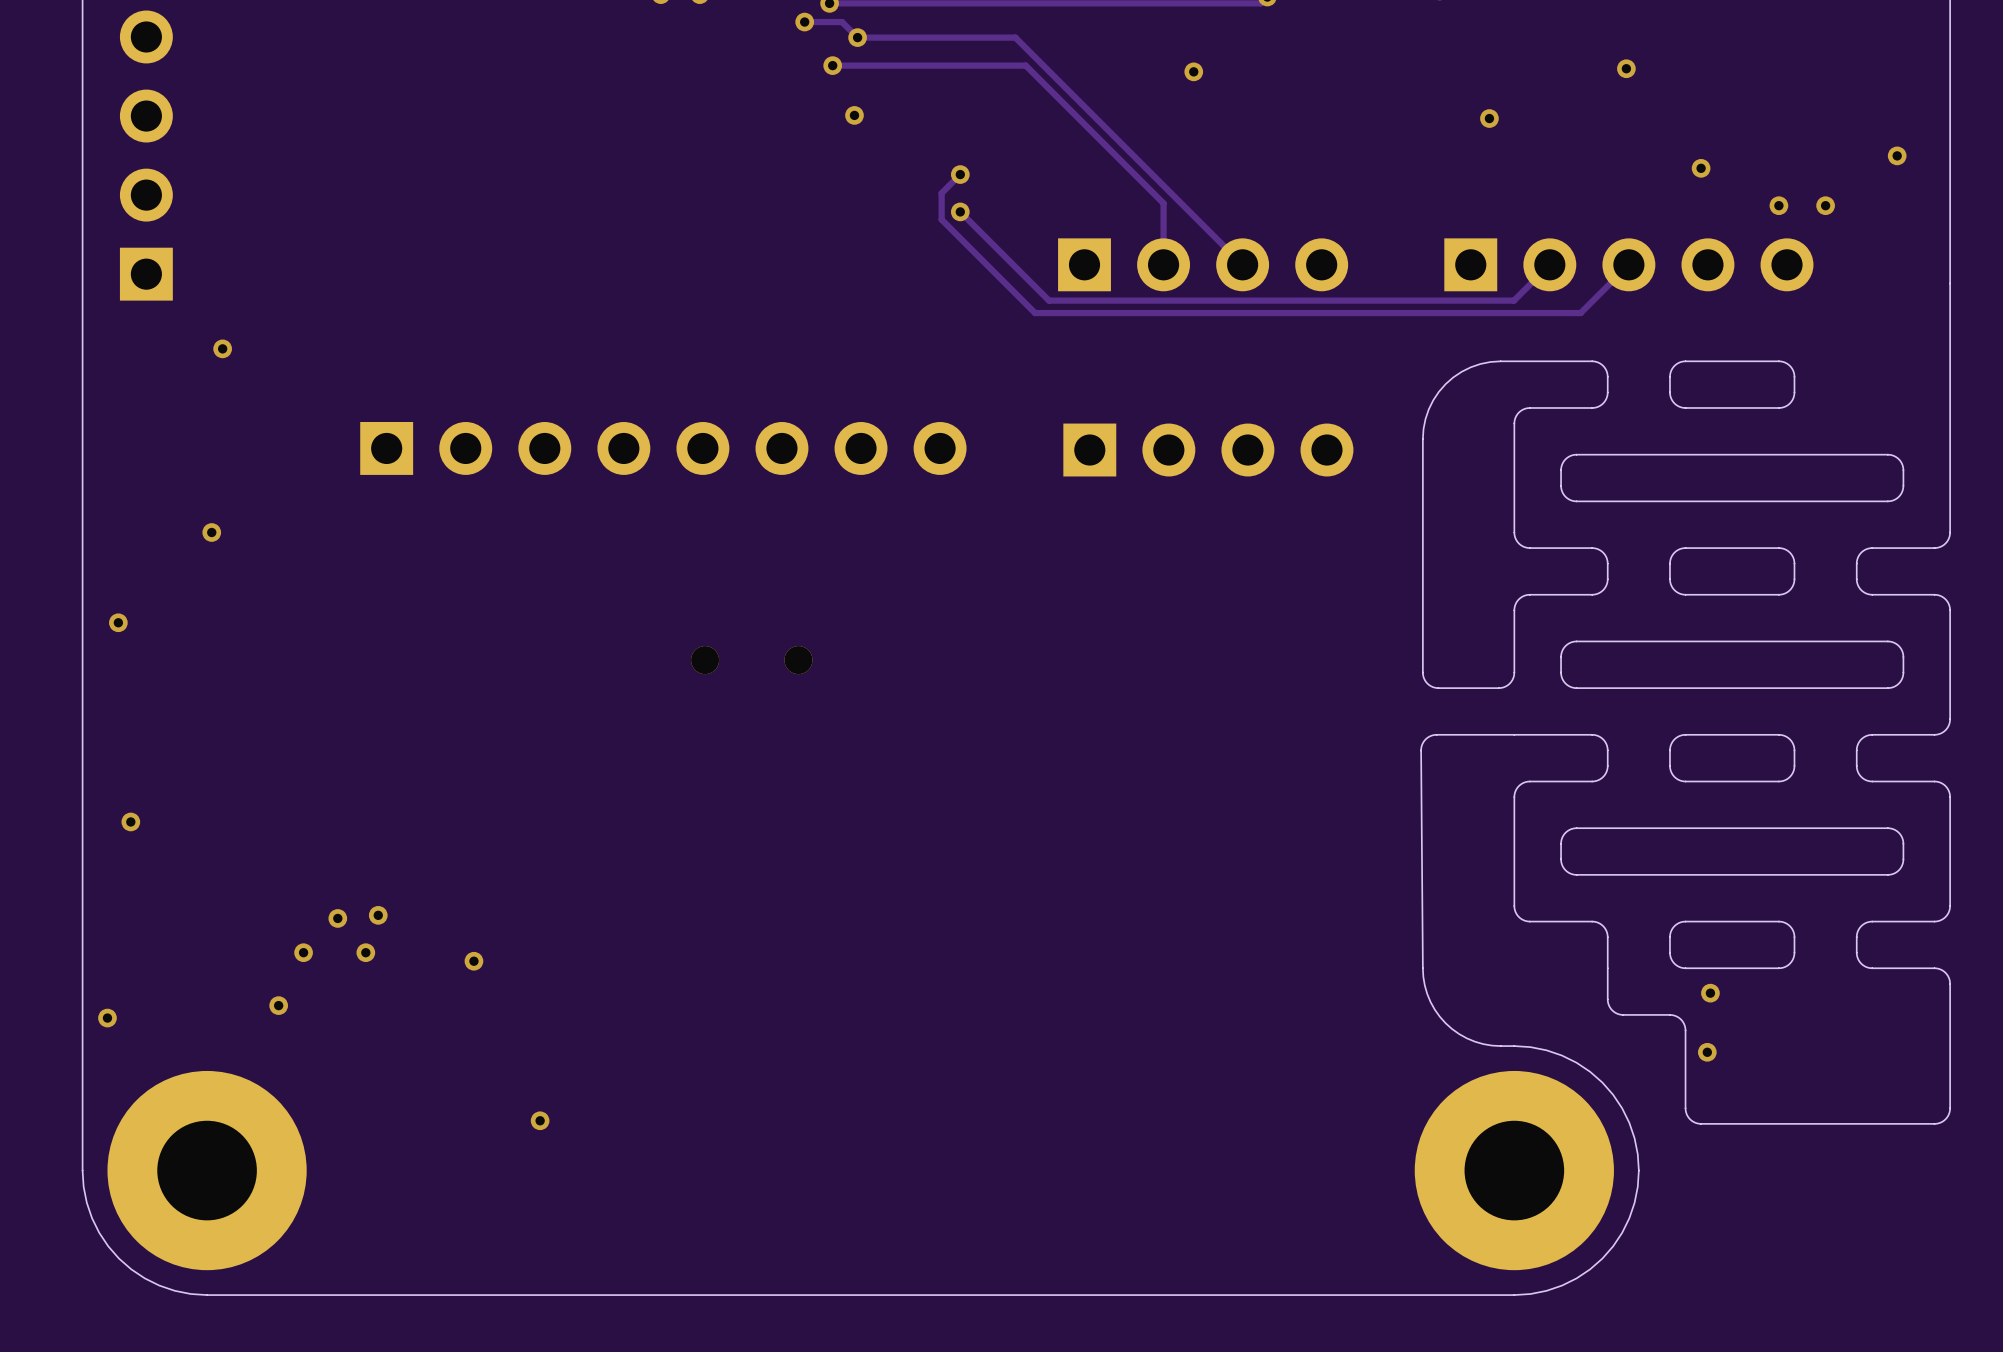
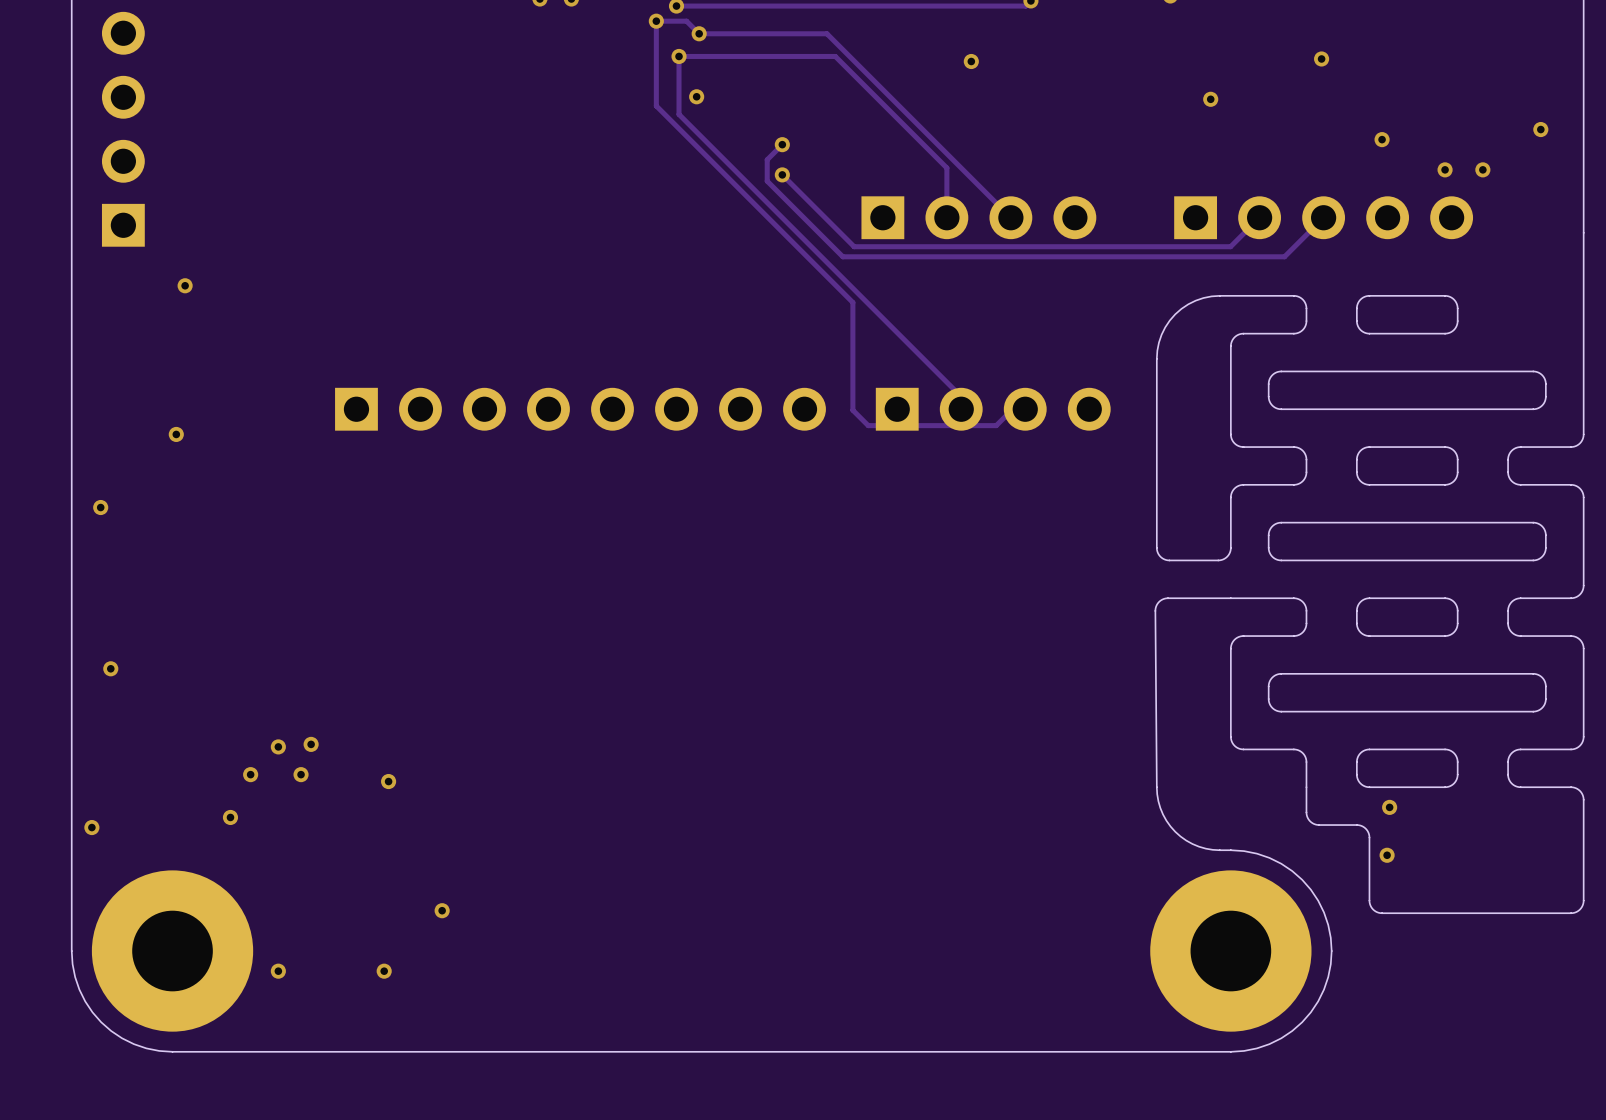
track: none -> (656, 21) (656, 105) (852, 302) (852, 410) (868, 425) (996, 425) (1025, 396)
track: none -> (679, 56) (679, 114) (961, 396)
part position: (663, 448) -> (580, 409)
part position: (1208, 450) -> (993, 409)
part: (751, 660) -> none
via: none -> (278, 971)
via: none -> (384, 971)

